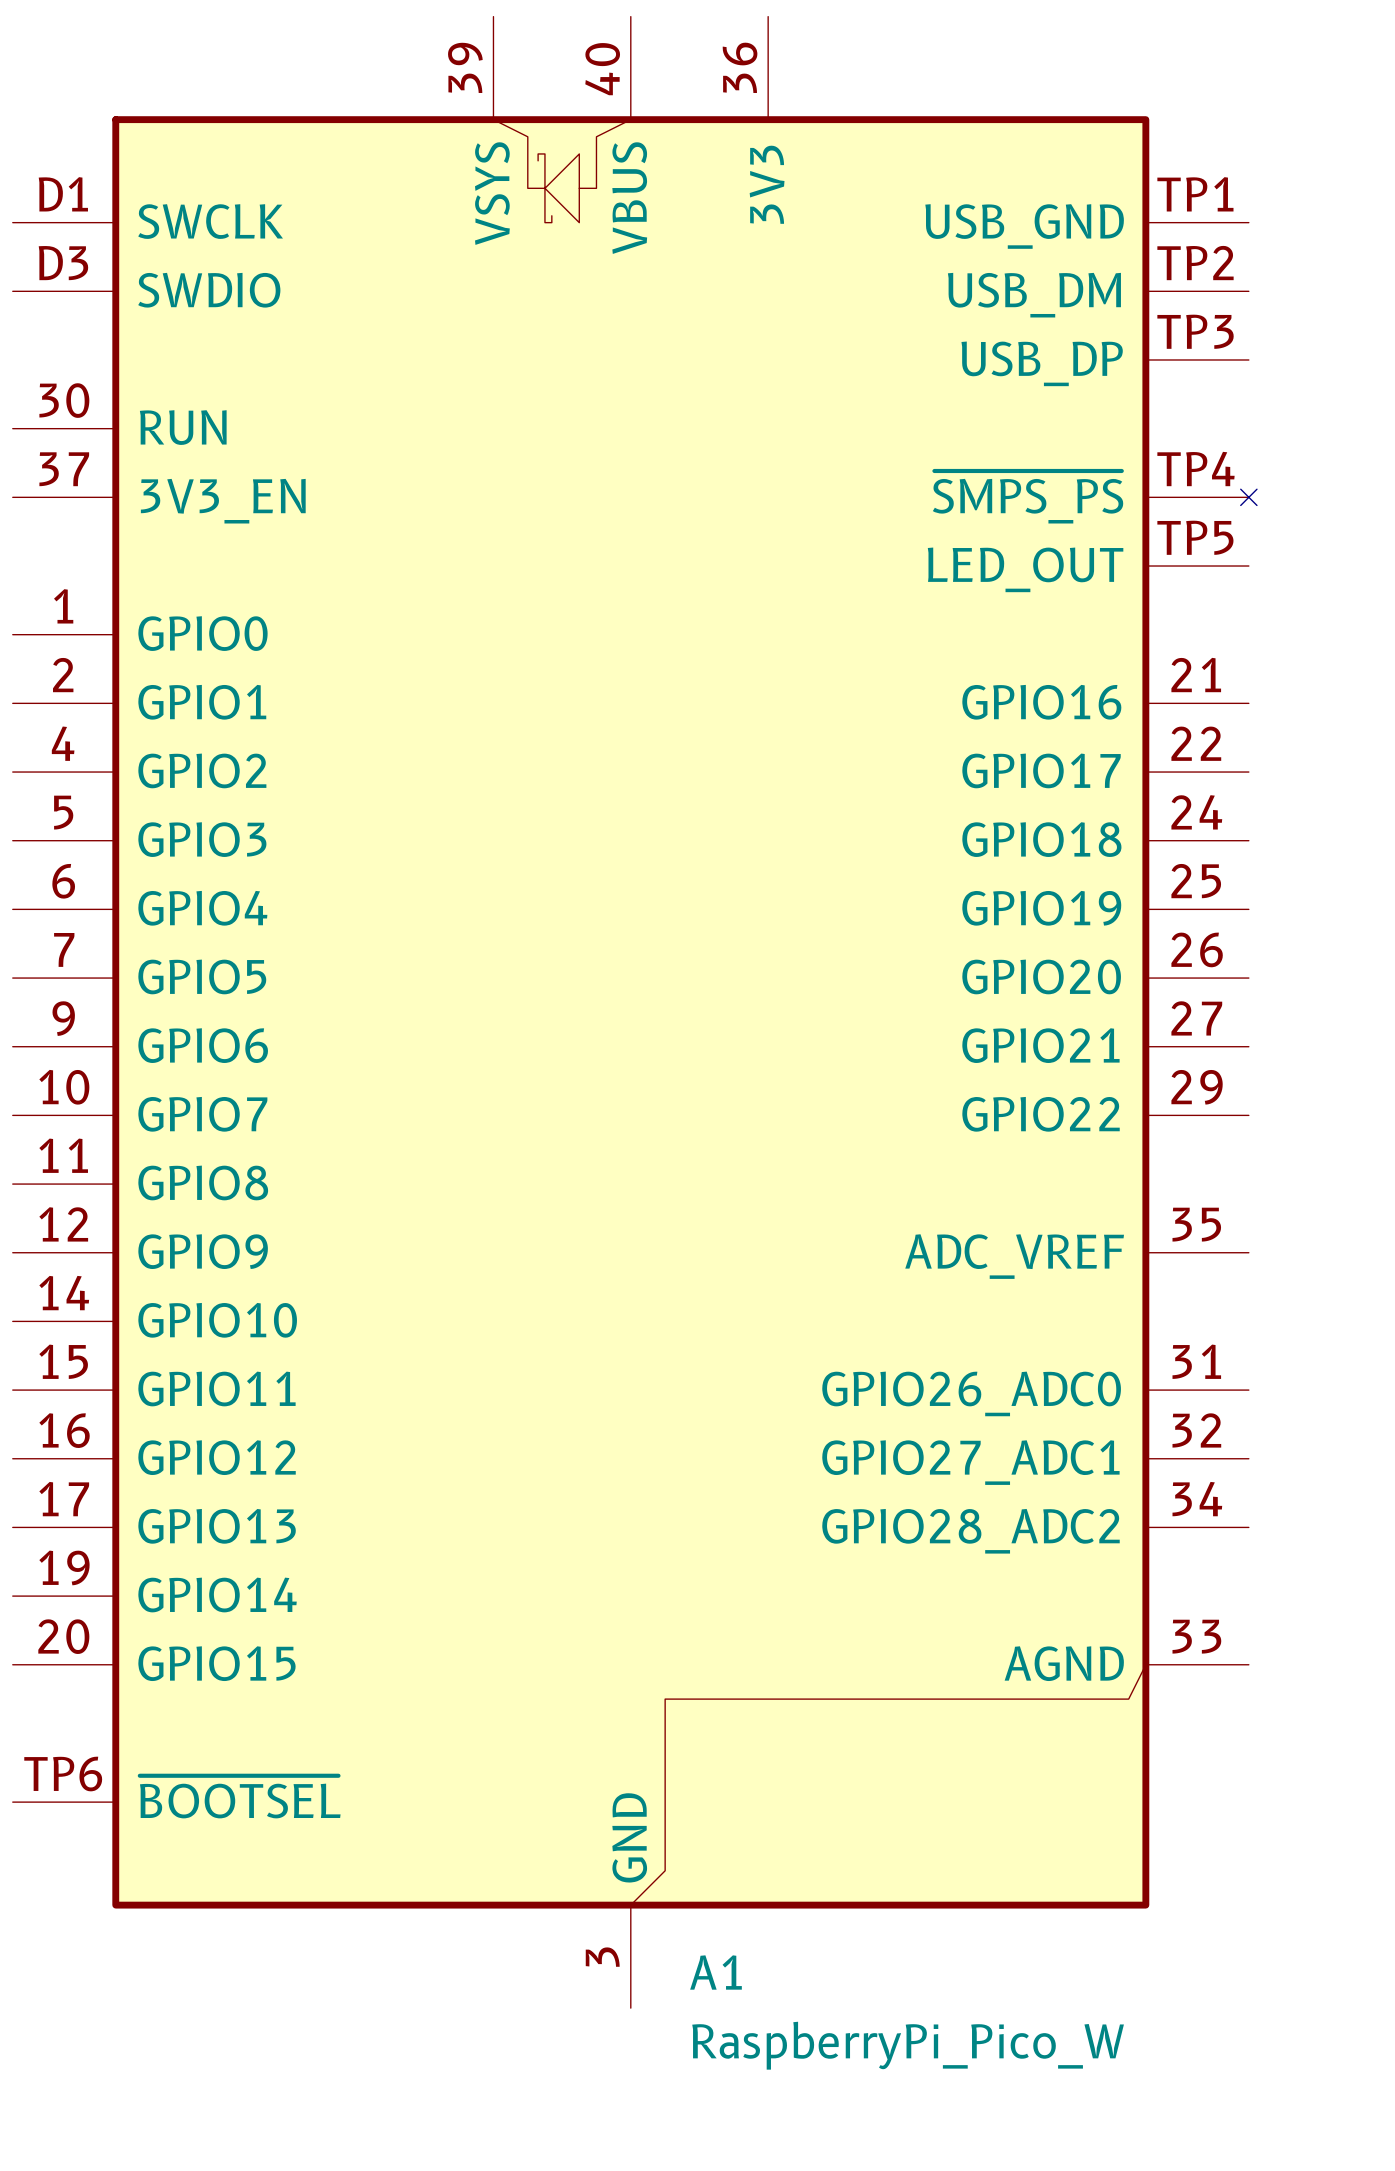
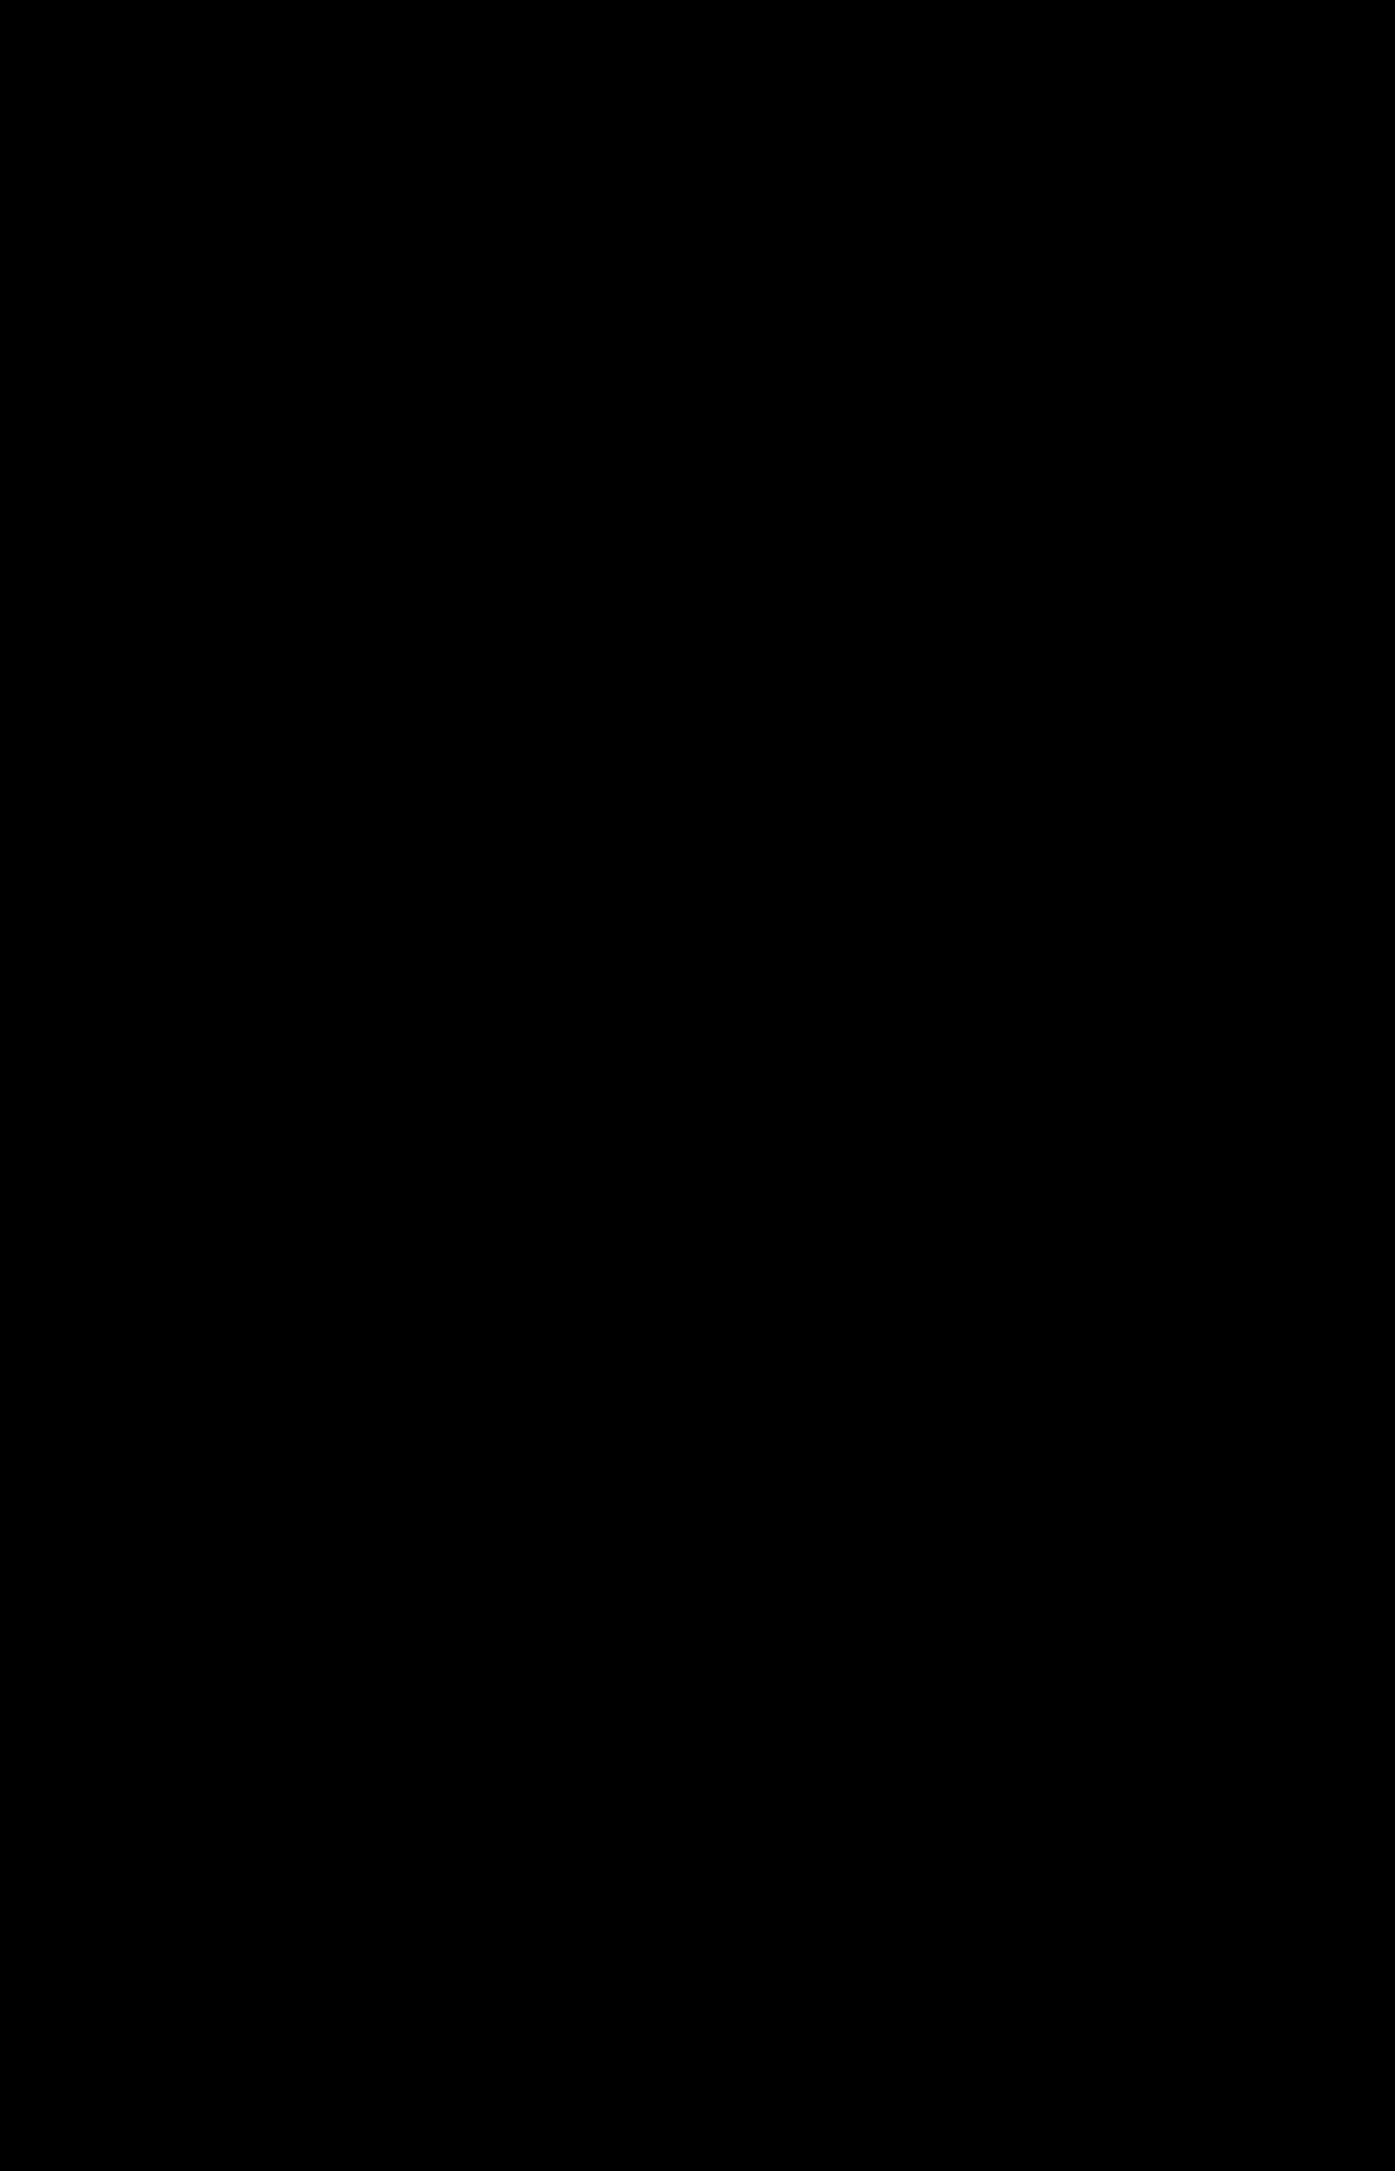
A1: RaspberryPi_Pico_W (634, 1012) -> none

